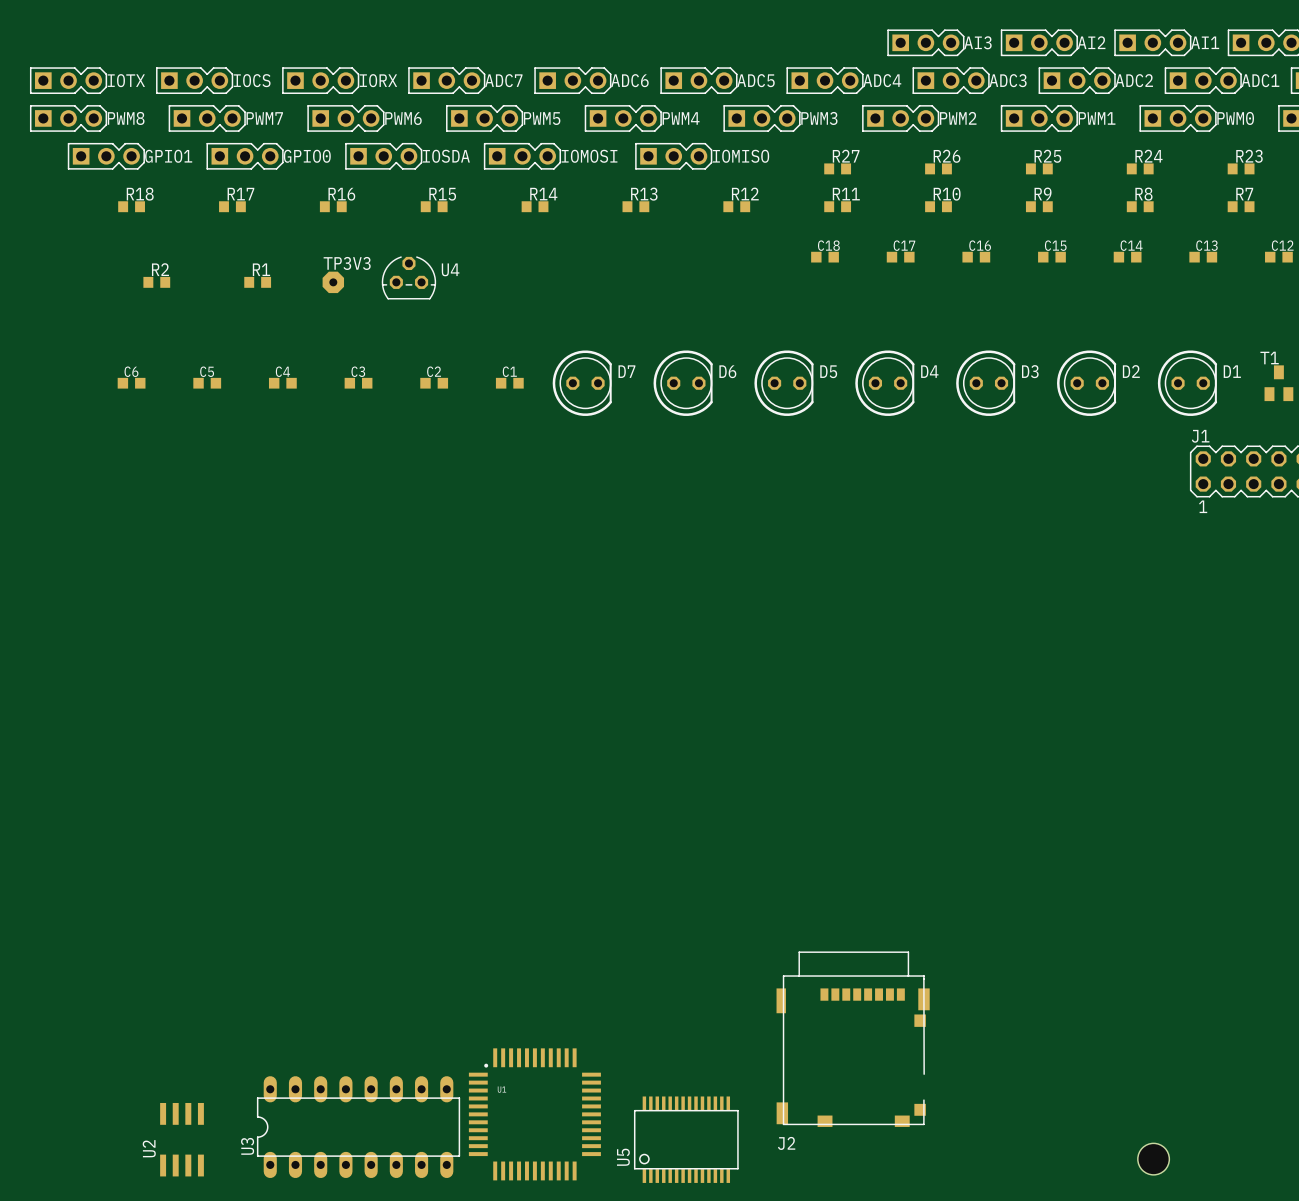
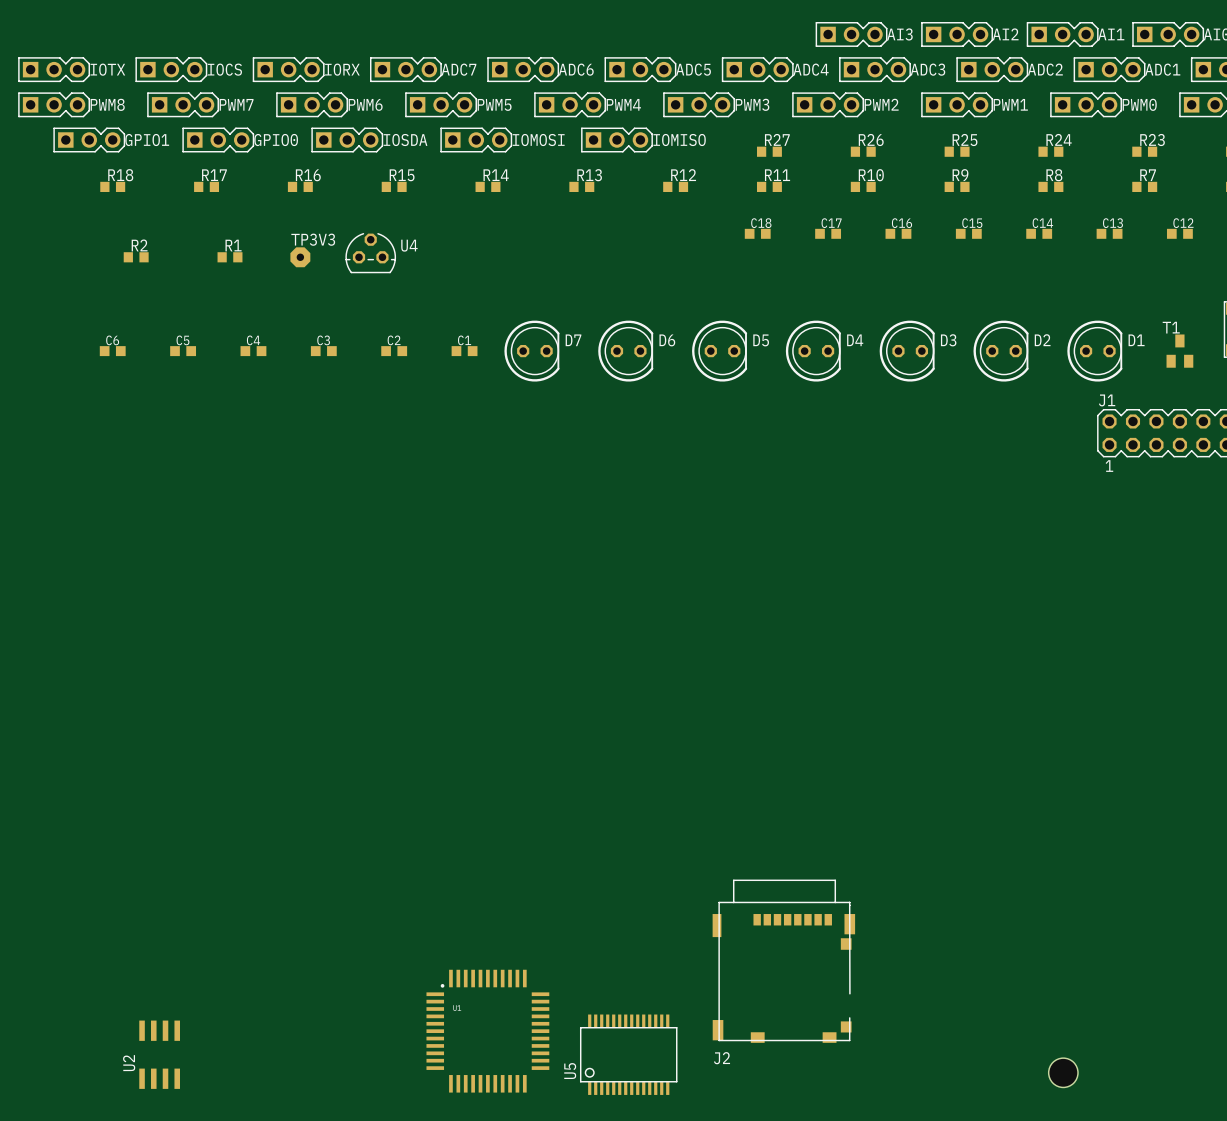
U3: (358, 1127) -> none

